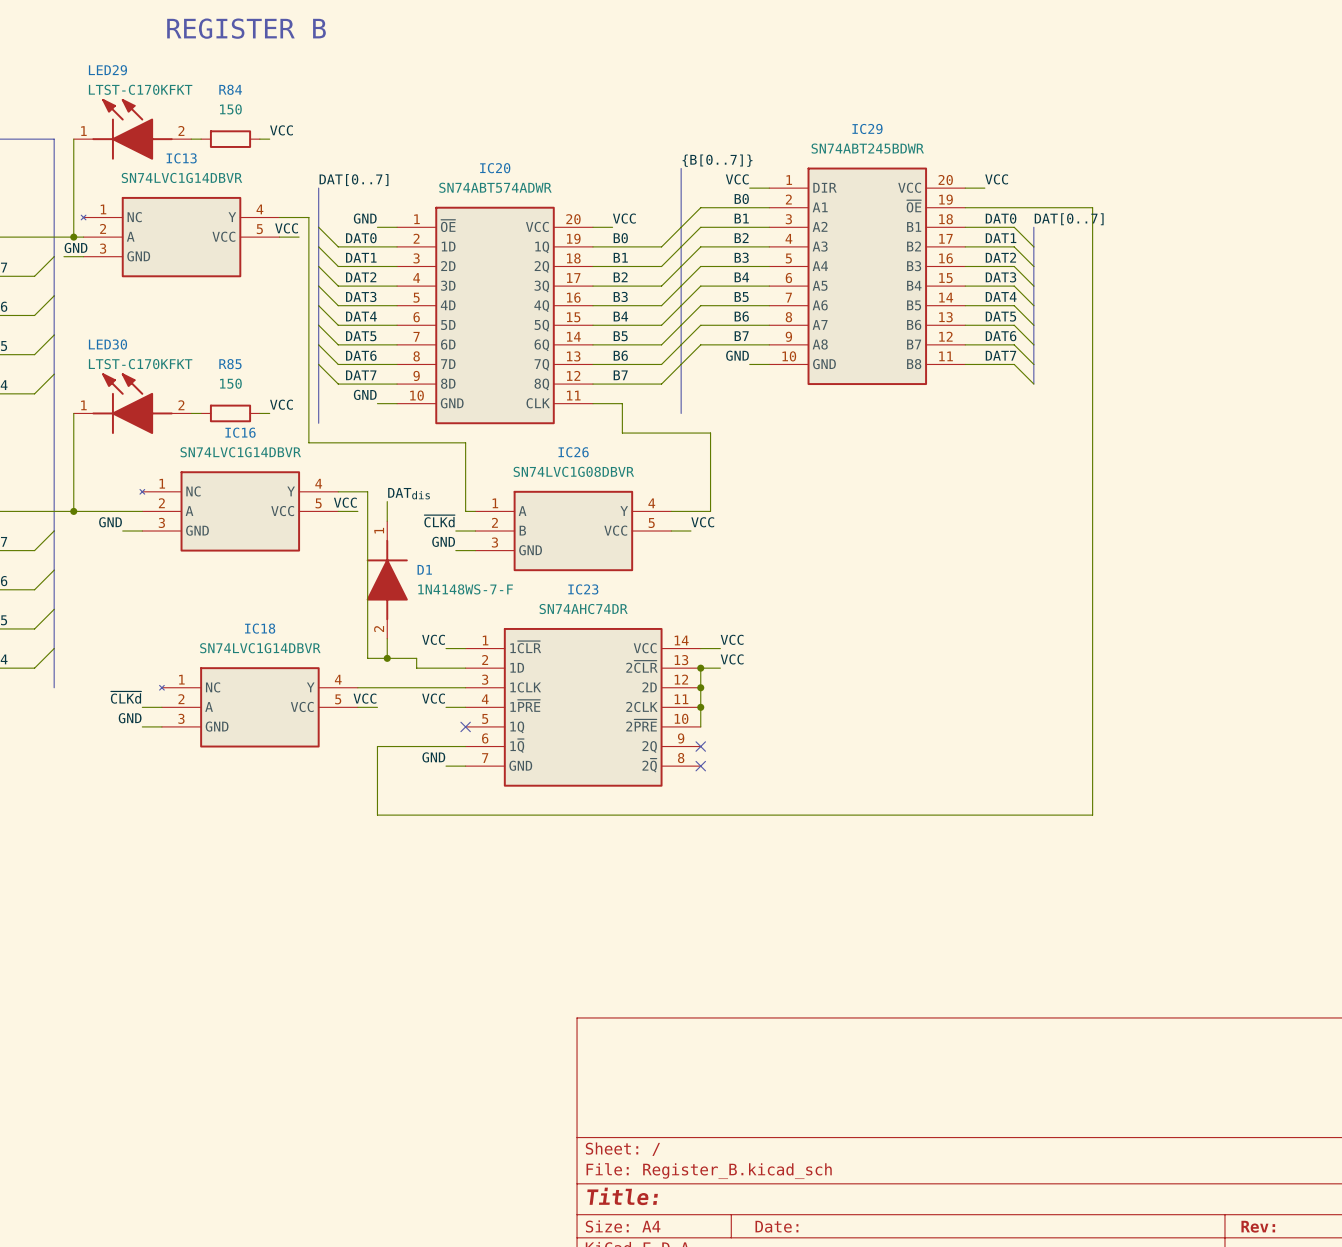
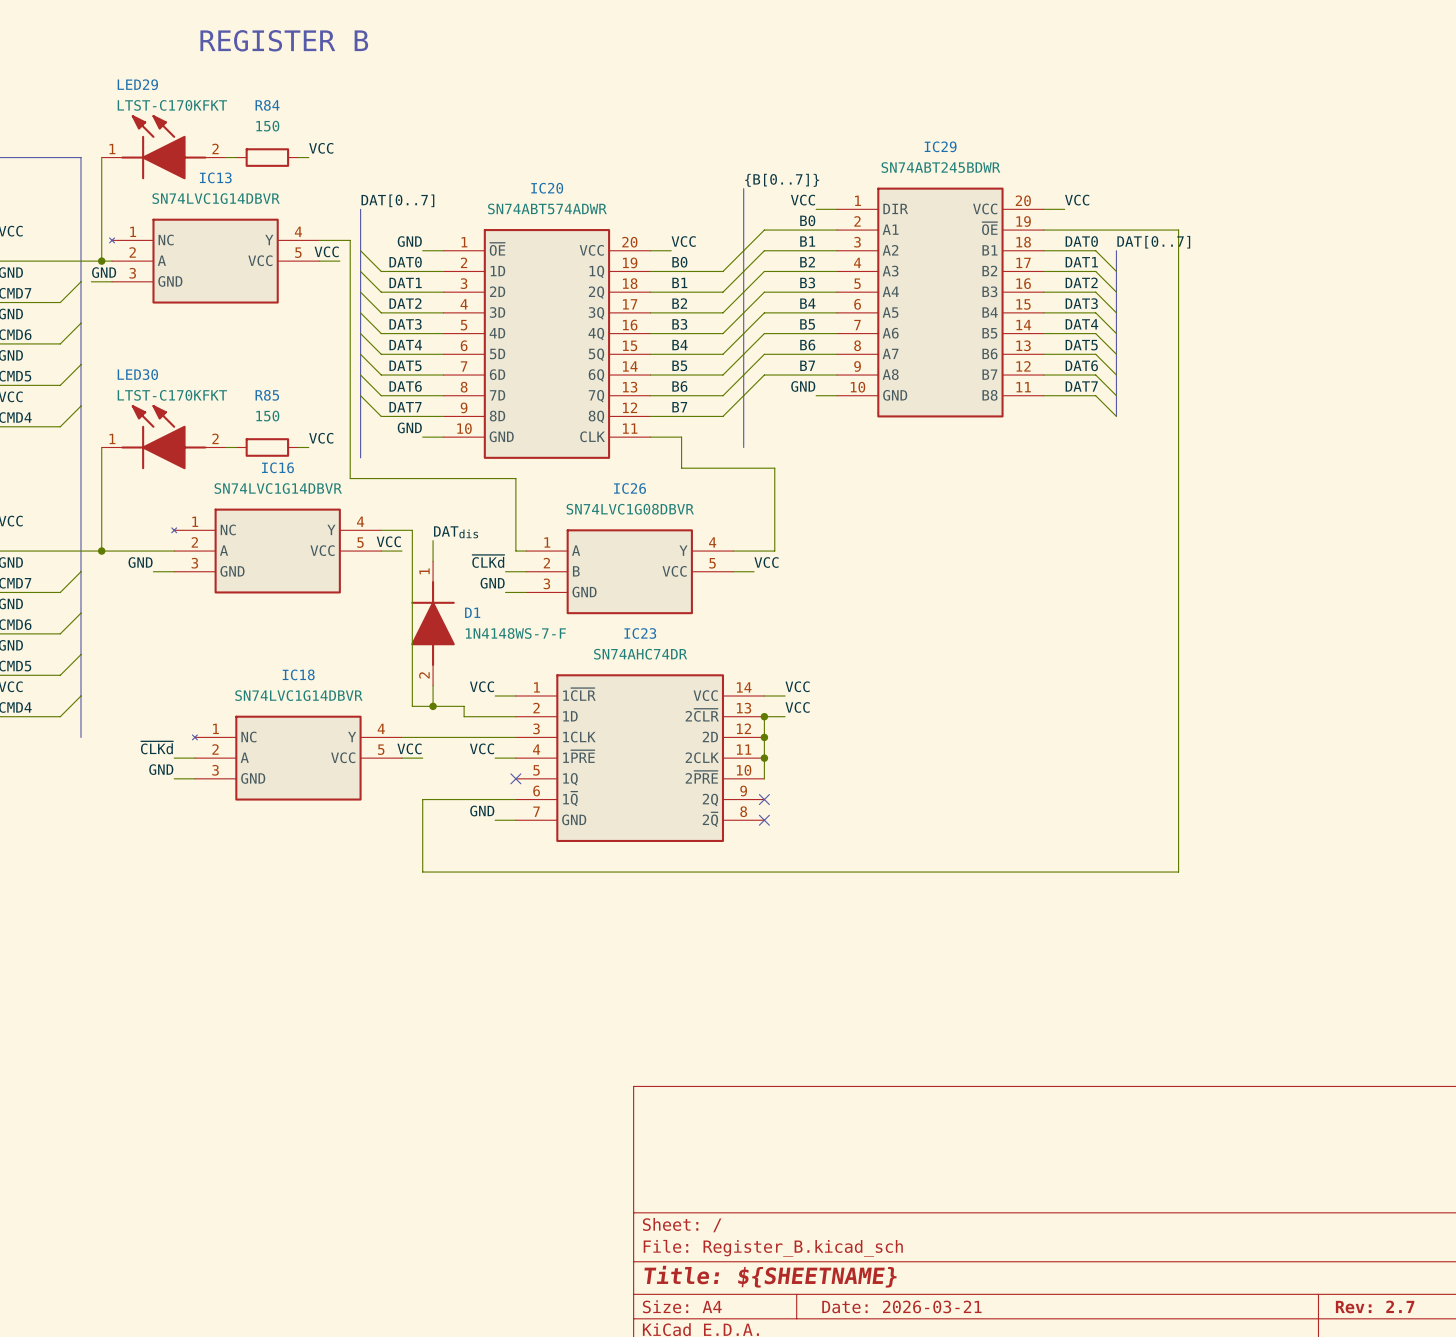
title block: Title: (622, 1196) -> Title: ${SHEETNAME} (770, 1276)
title block: Date: (776, 1226) -> Date: 2026-03-21 (901, 1306)
title block: Rev: (1258, 1226) -> Rev: 2.7 (1375, 1306)

